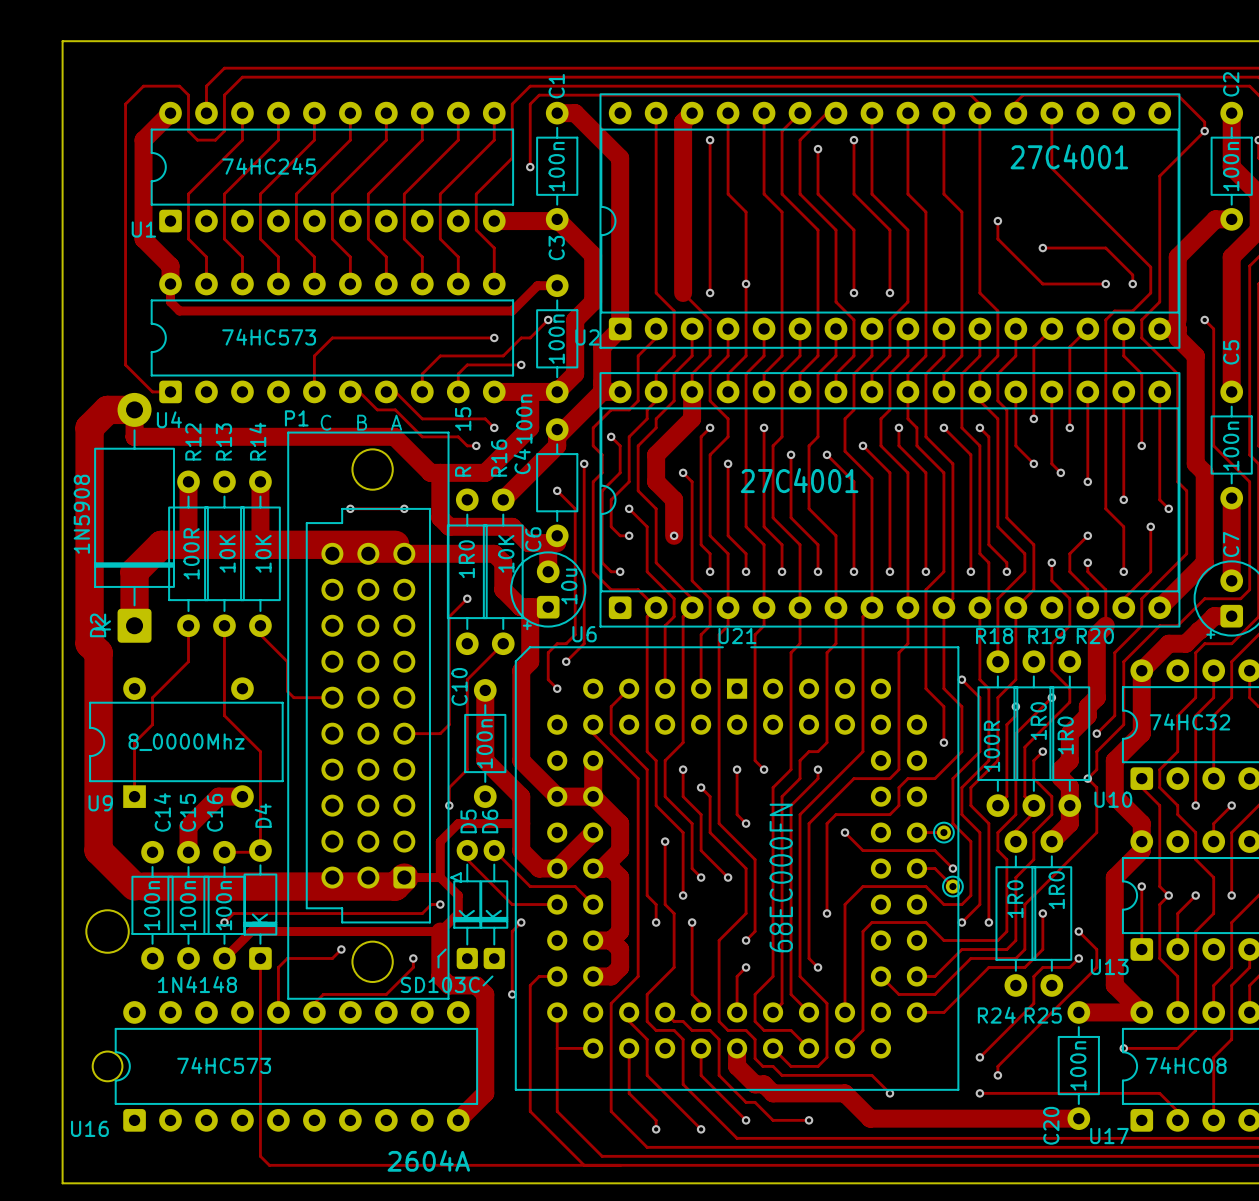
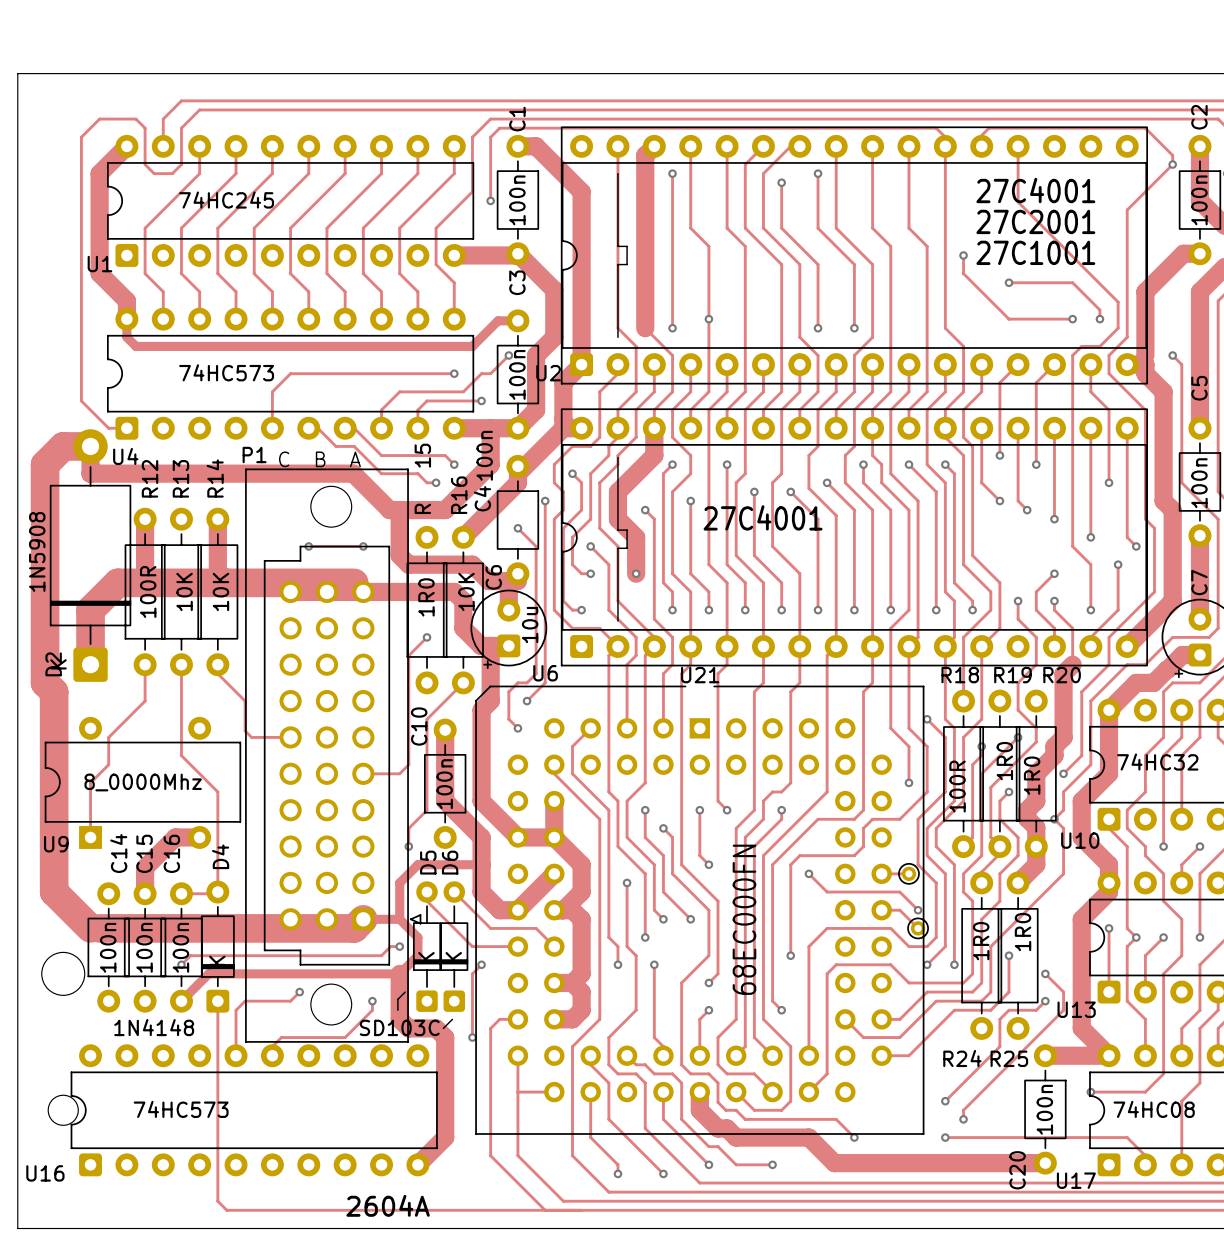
line: none -> (617, 173) (617, 246) (627, 246) (627, 264) (617, 264) (617, 337)
text: none -> 27C2001 (1035, 221)
text: none -> 27C1001 (1035, 252)
line: none -> (617, 457) (617, 530) (627, 530) (627, 548) (617, 548) (617, 621)

